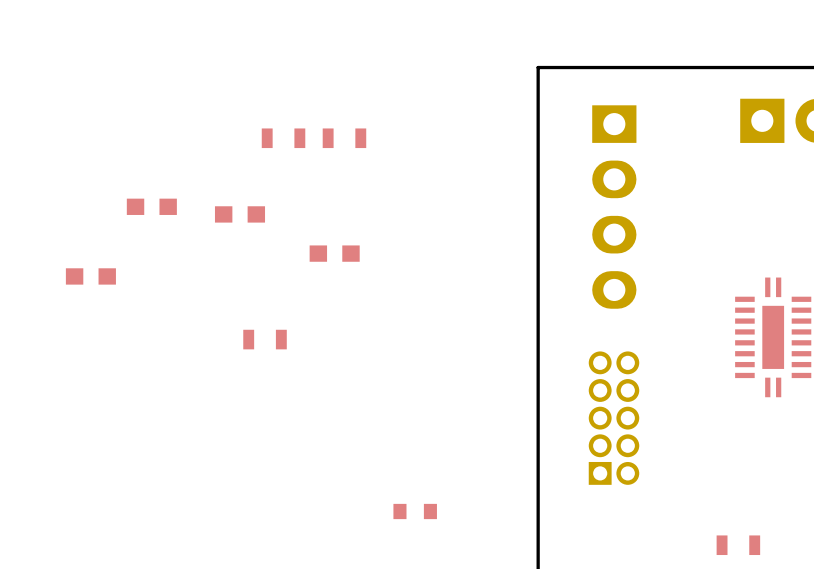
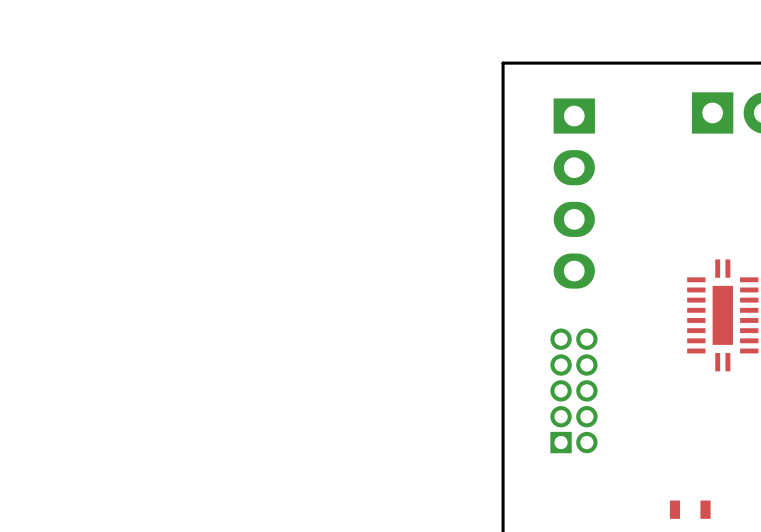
part: (283, 138) -> none
part: (344, 138) -> none
part: (151, 206) -> none
part: (240, 214) -> none
part: (334, 253) -> none
part: (90, 276) -> none
part: (265, 339) -> none
part: (415, 511) -> none

